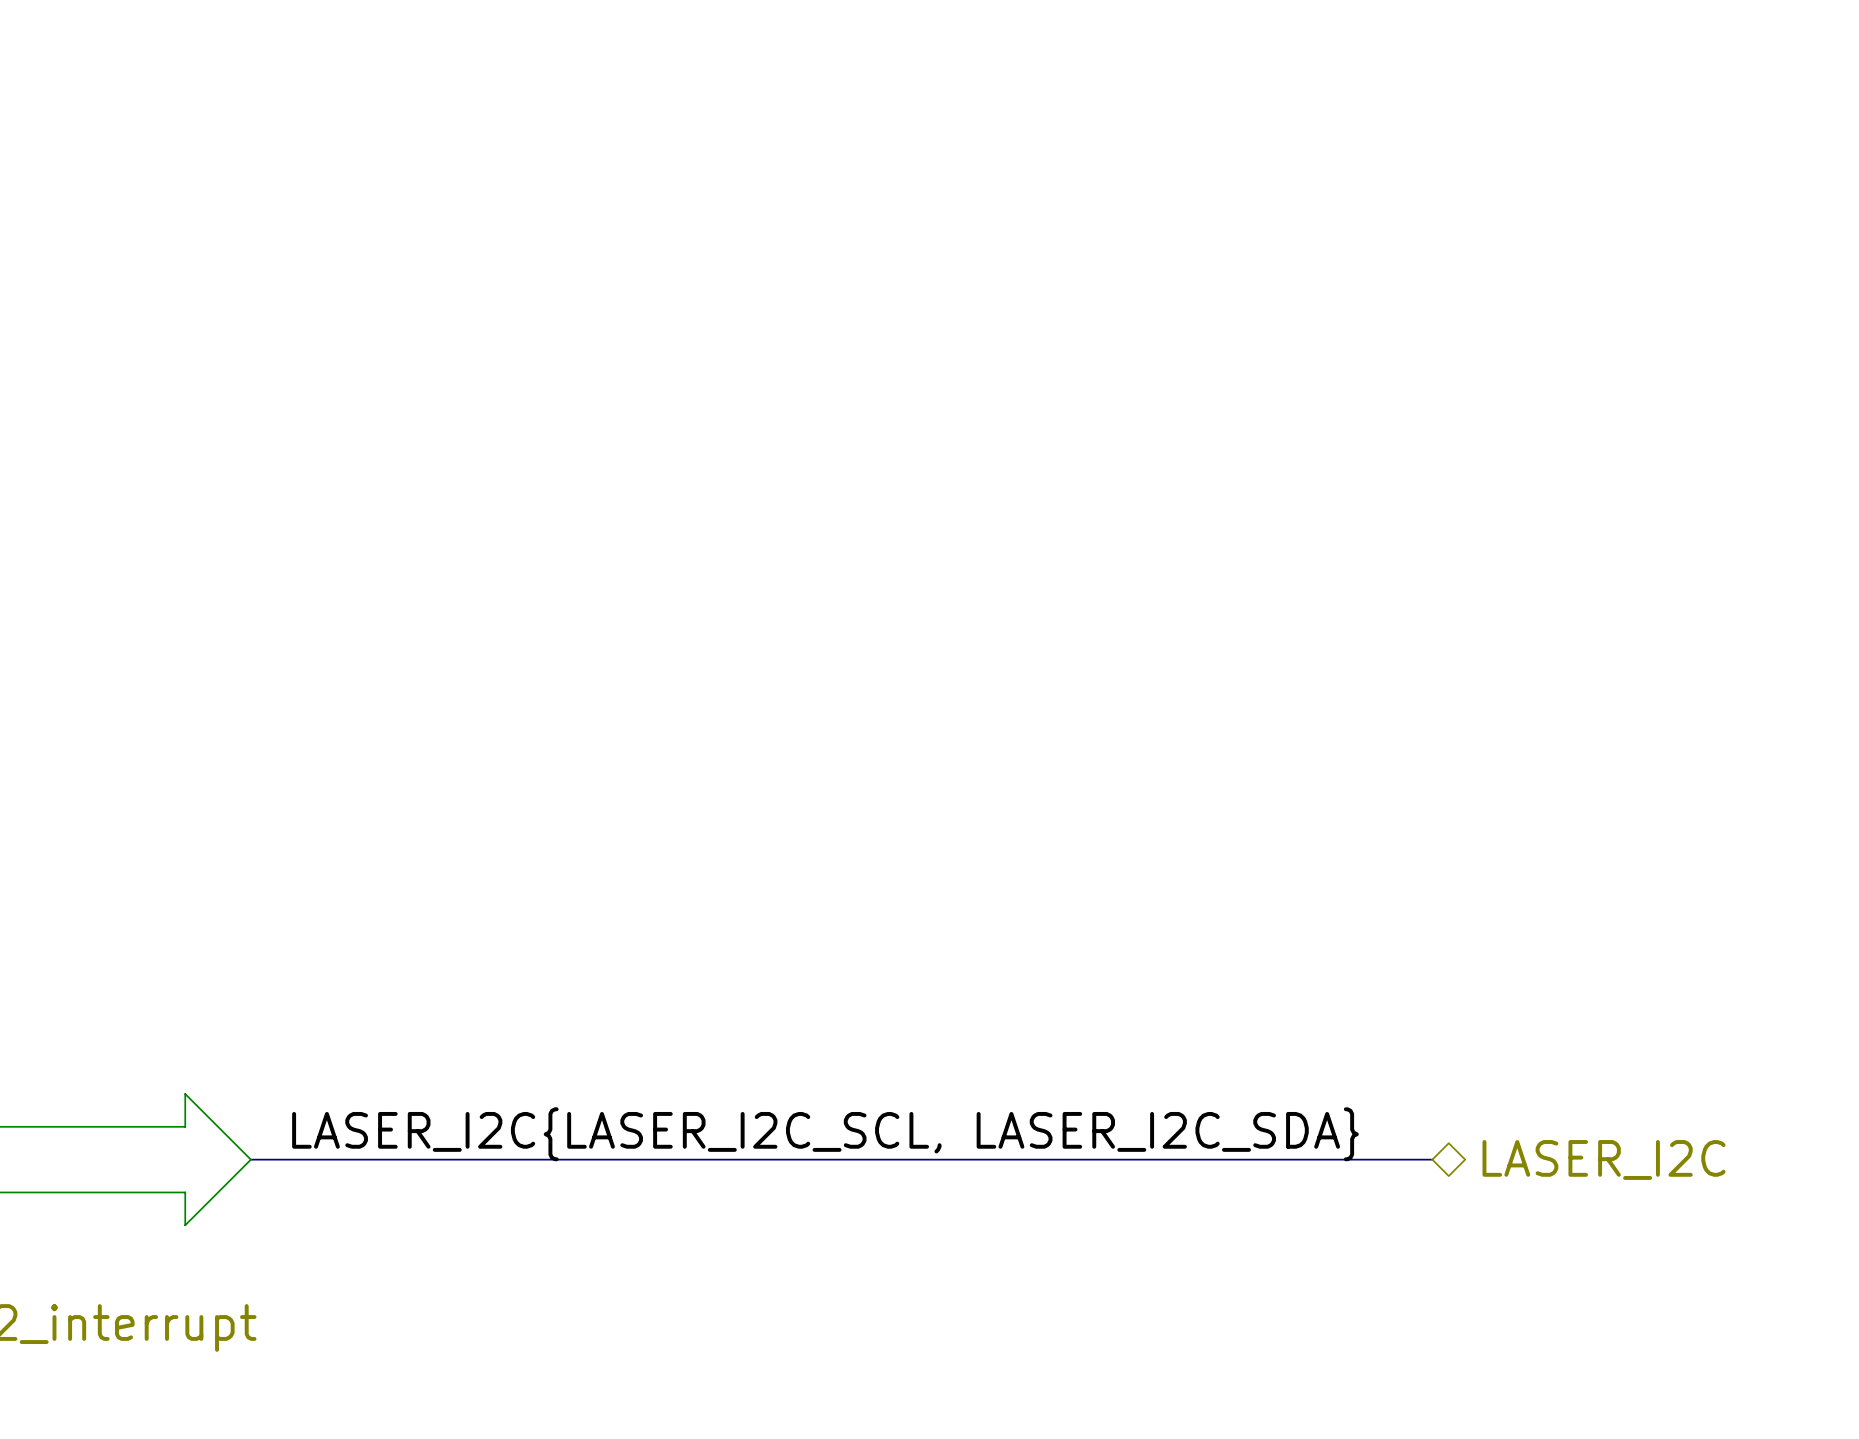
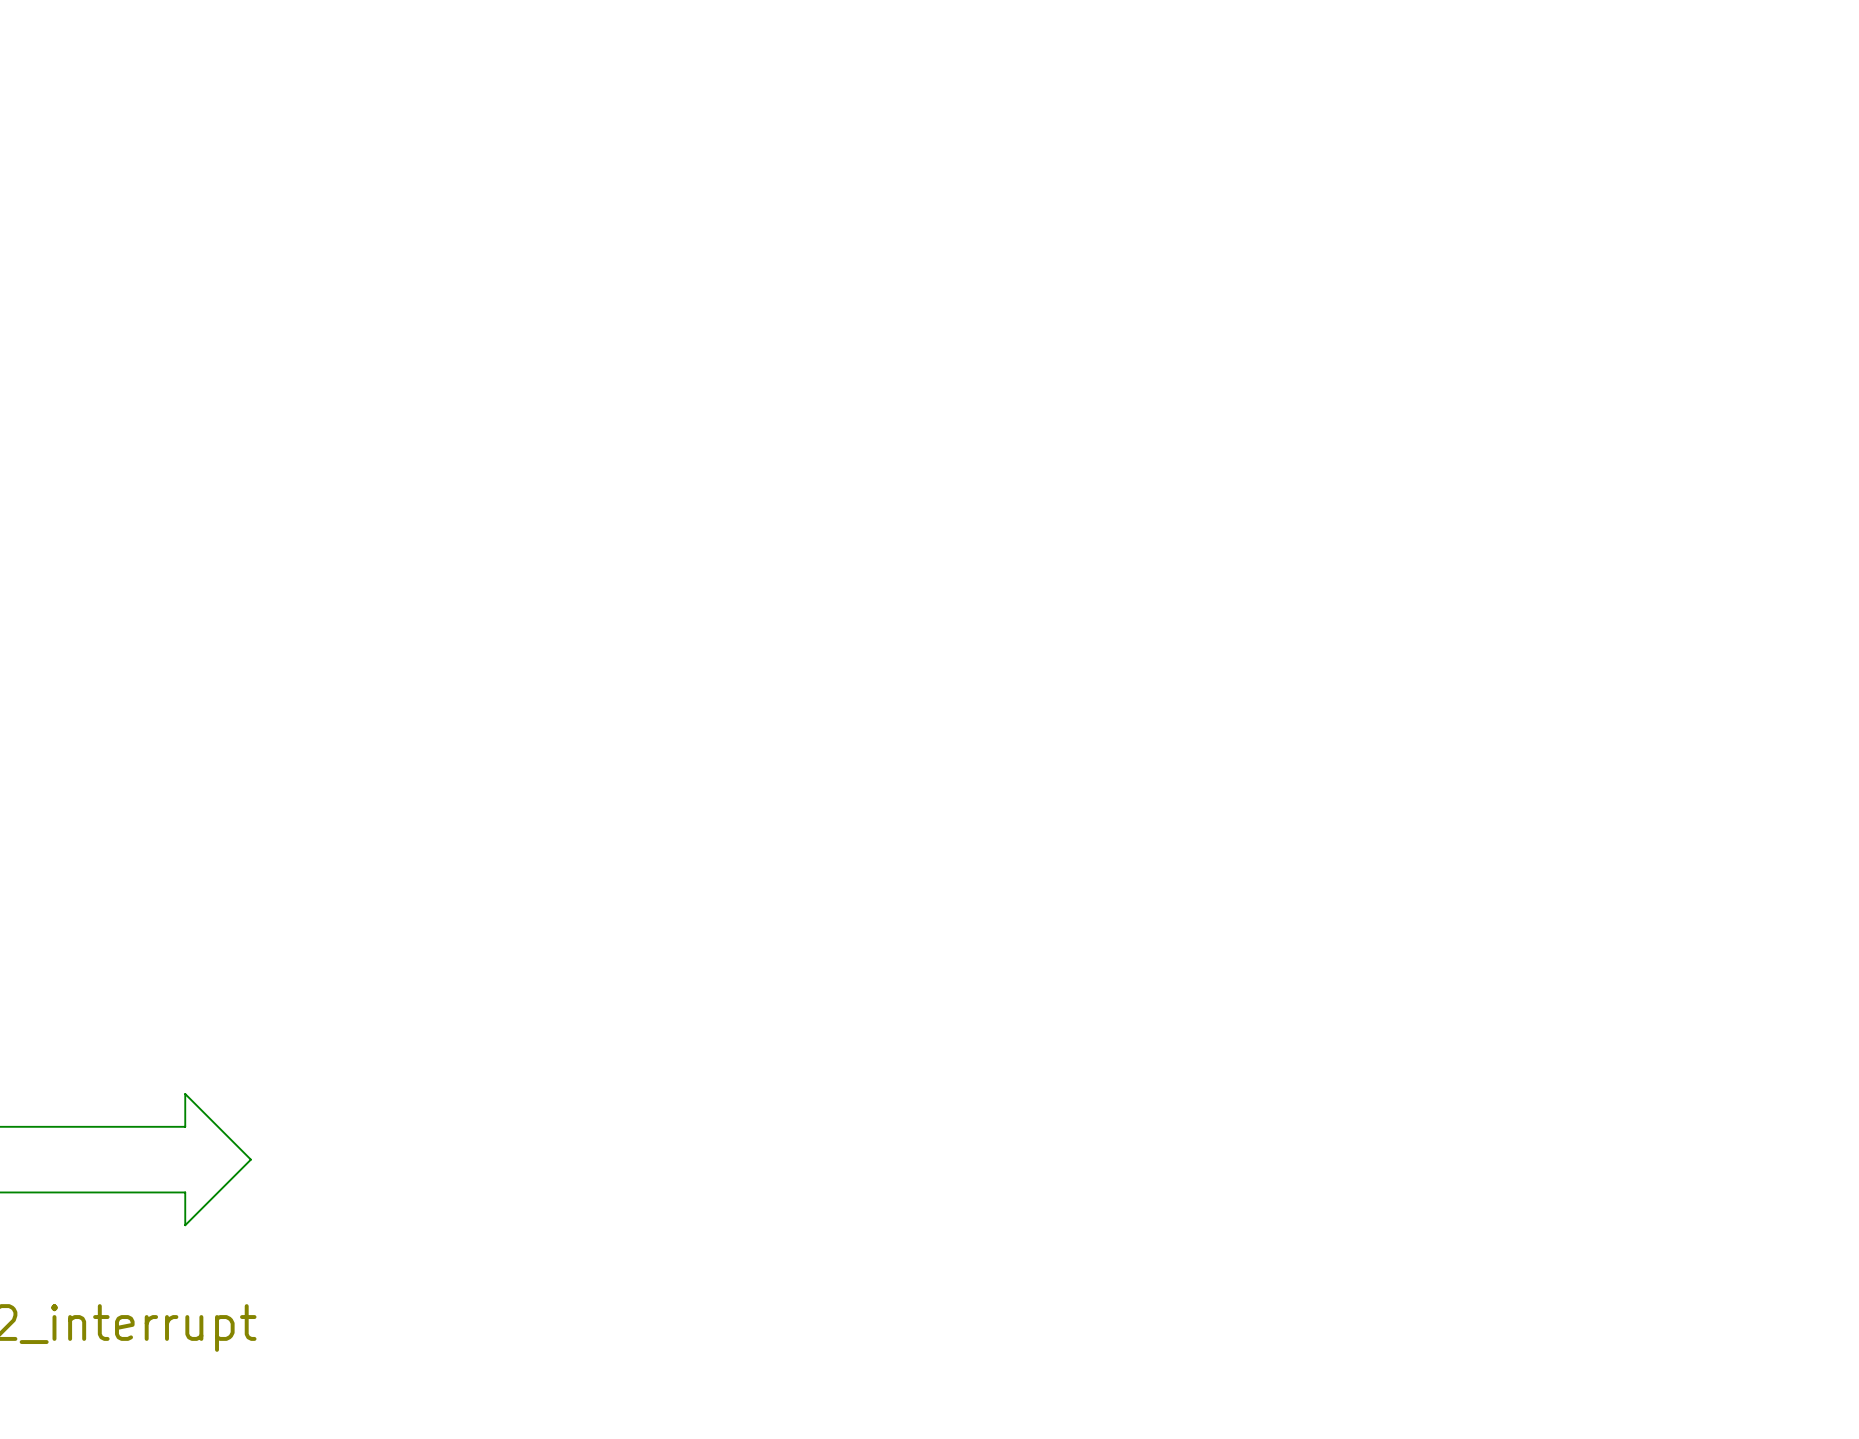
label: LASER_I2C{LASER_I2C_SCL, LASER_I2C_SDA} (825, 1134) -> none
bus: (250, 1159) (1432, 1159) -> none
hierarchical label: LASER_I2C (1604, 1159) -> none

